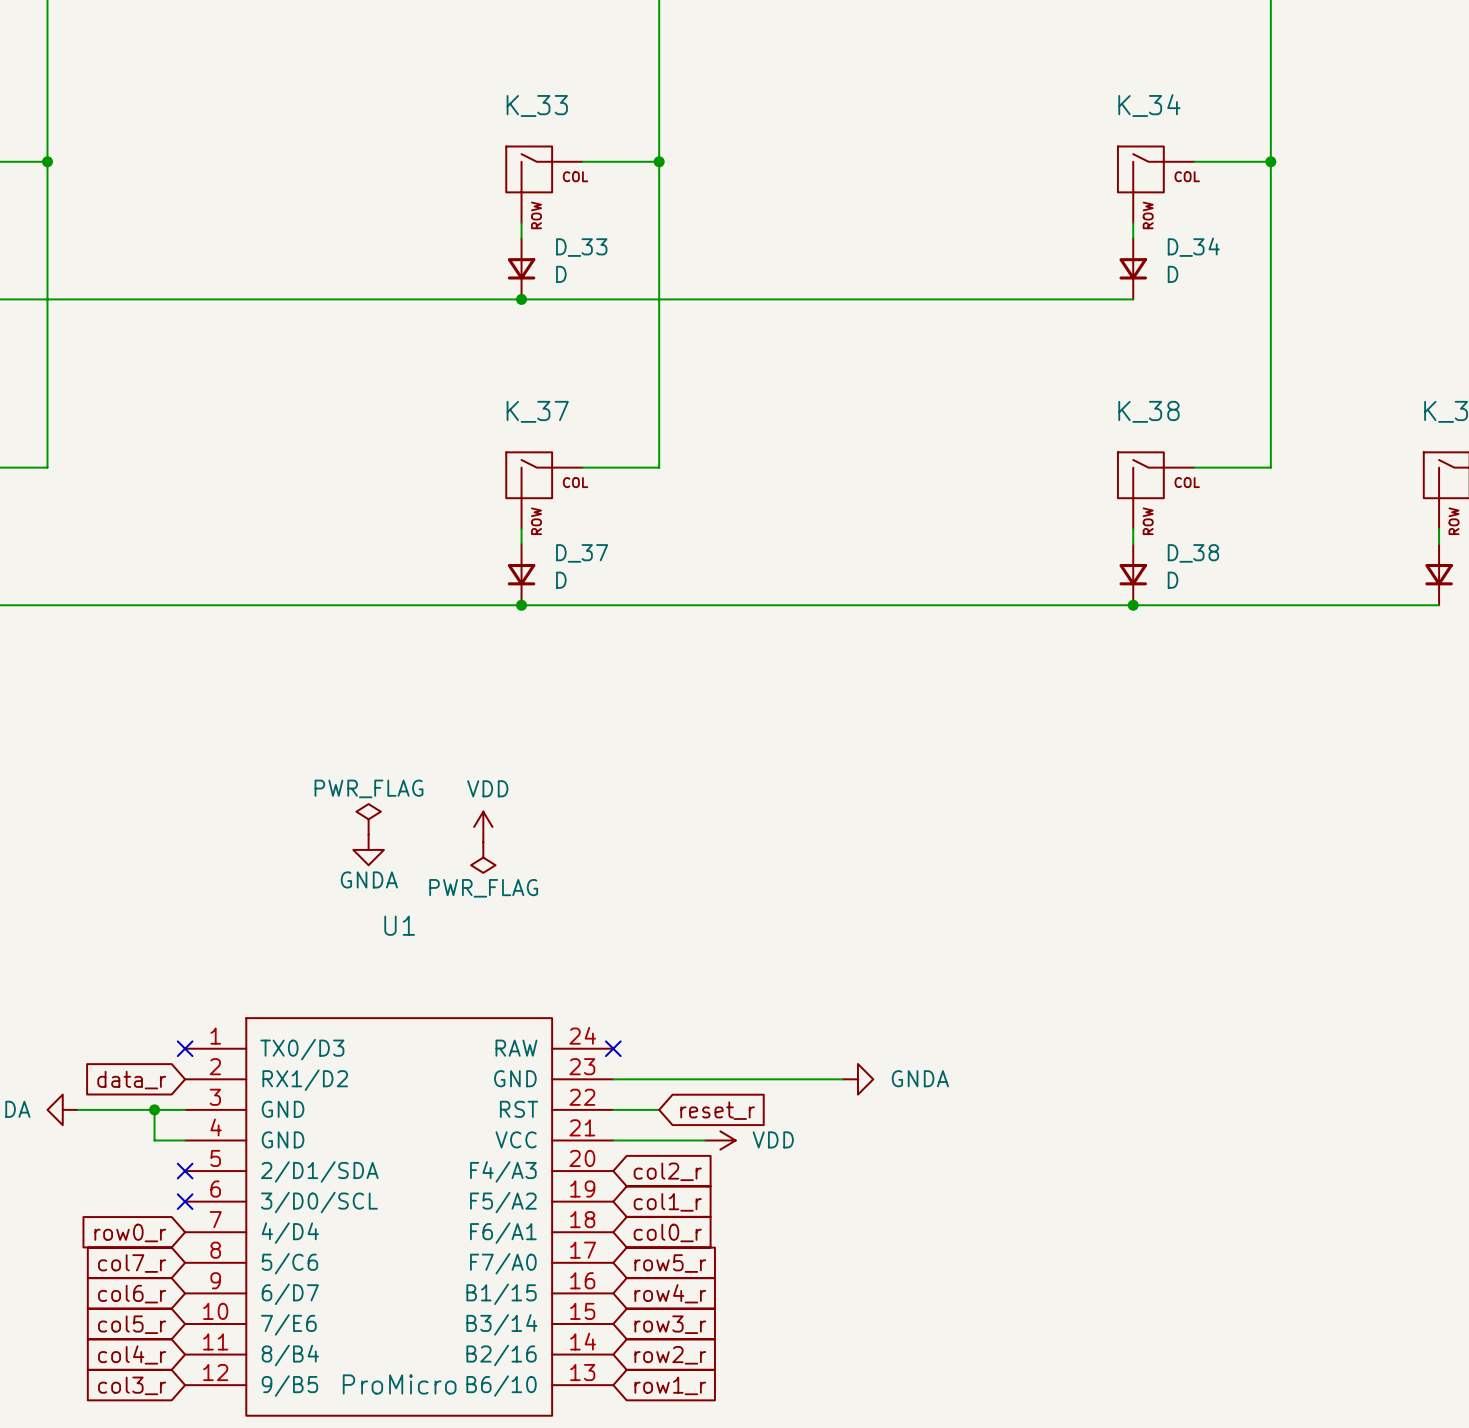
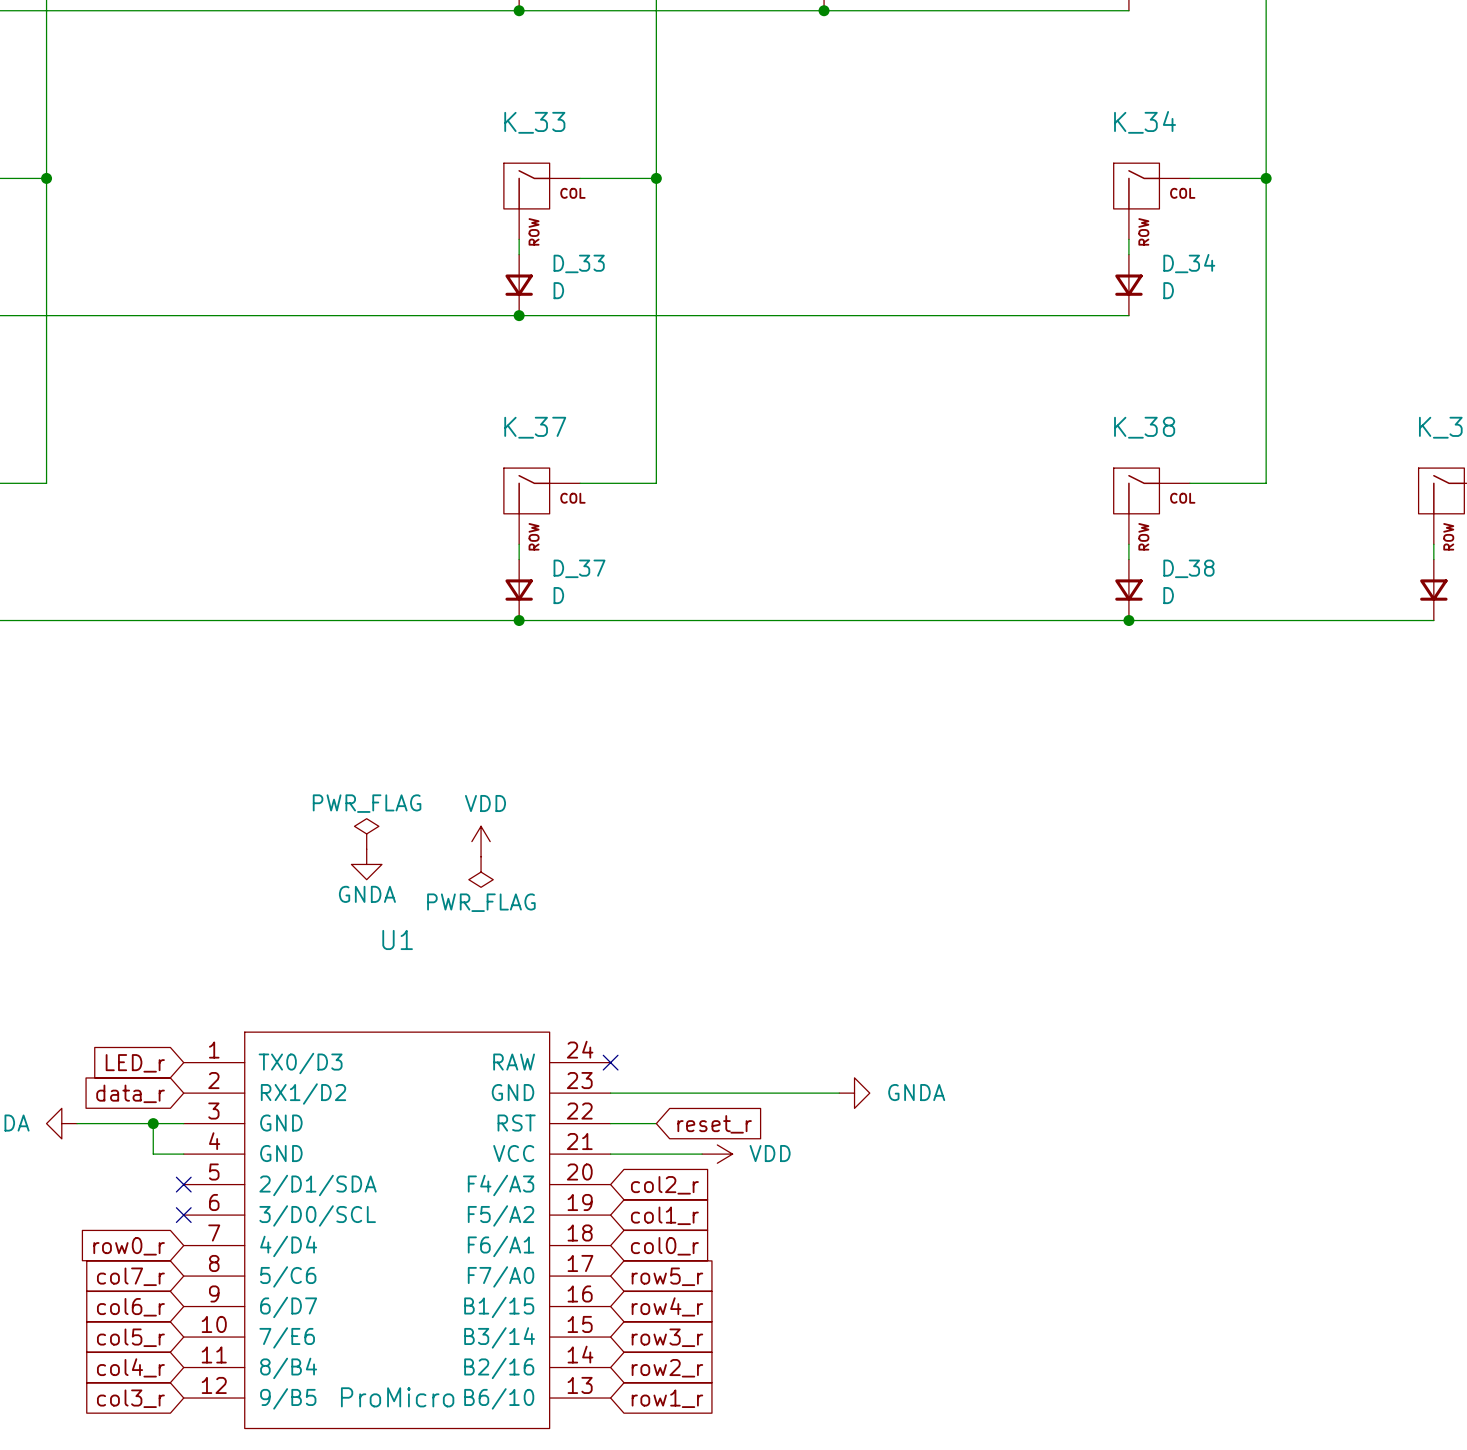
no-connect mark: (185, 1048) -> none
global label: none -> LED_r (135, 1063)

